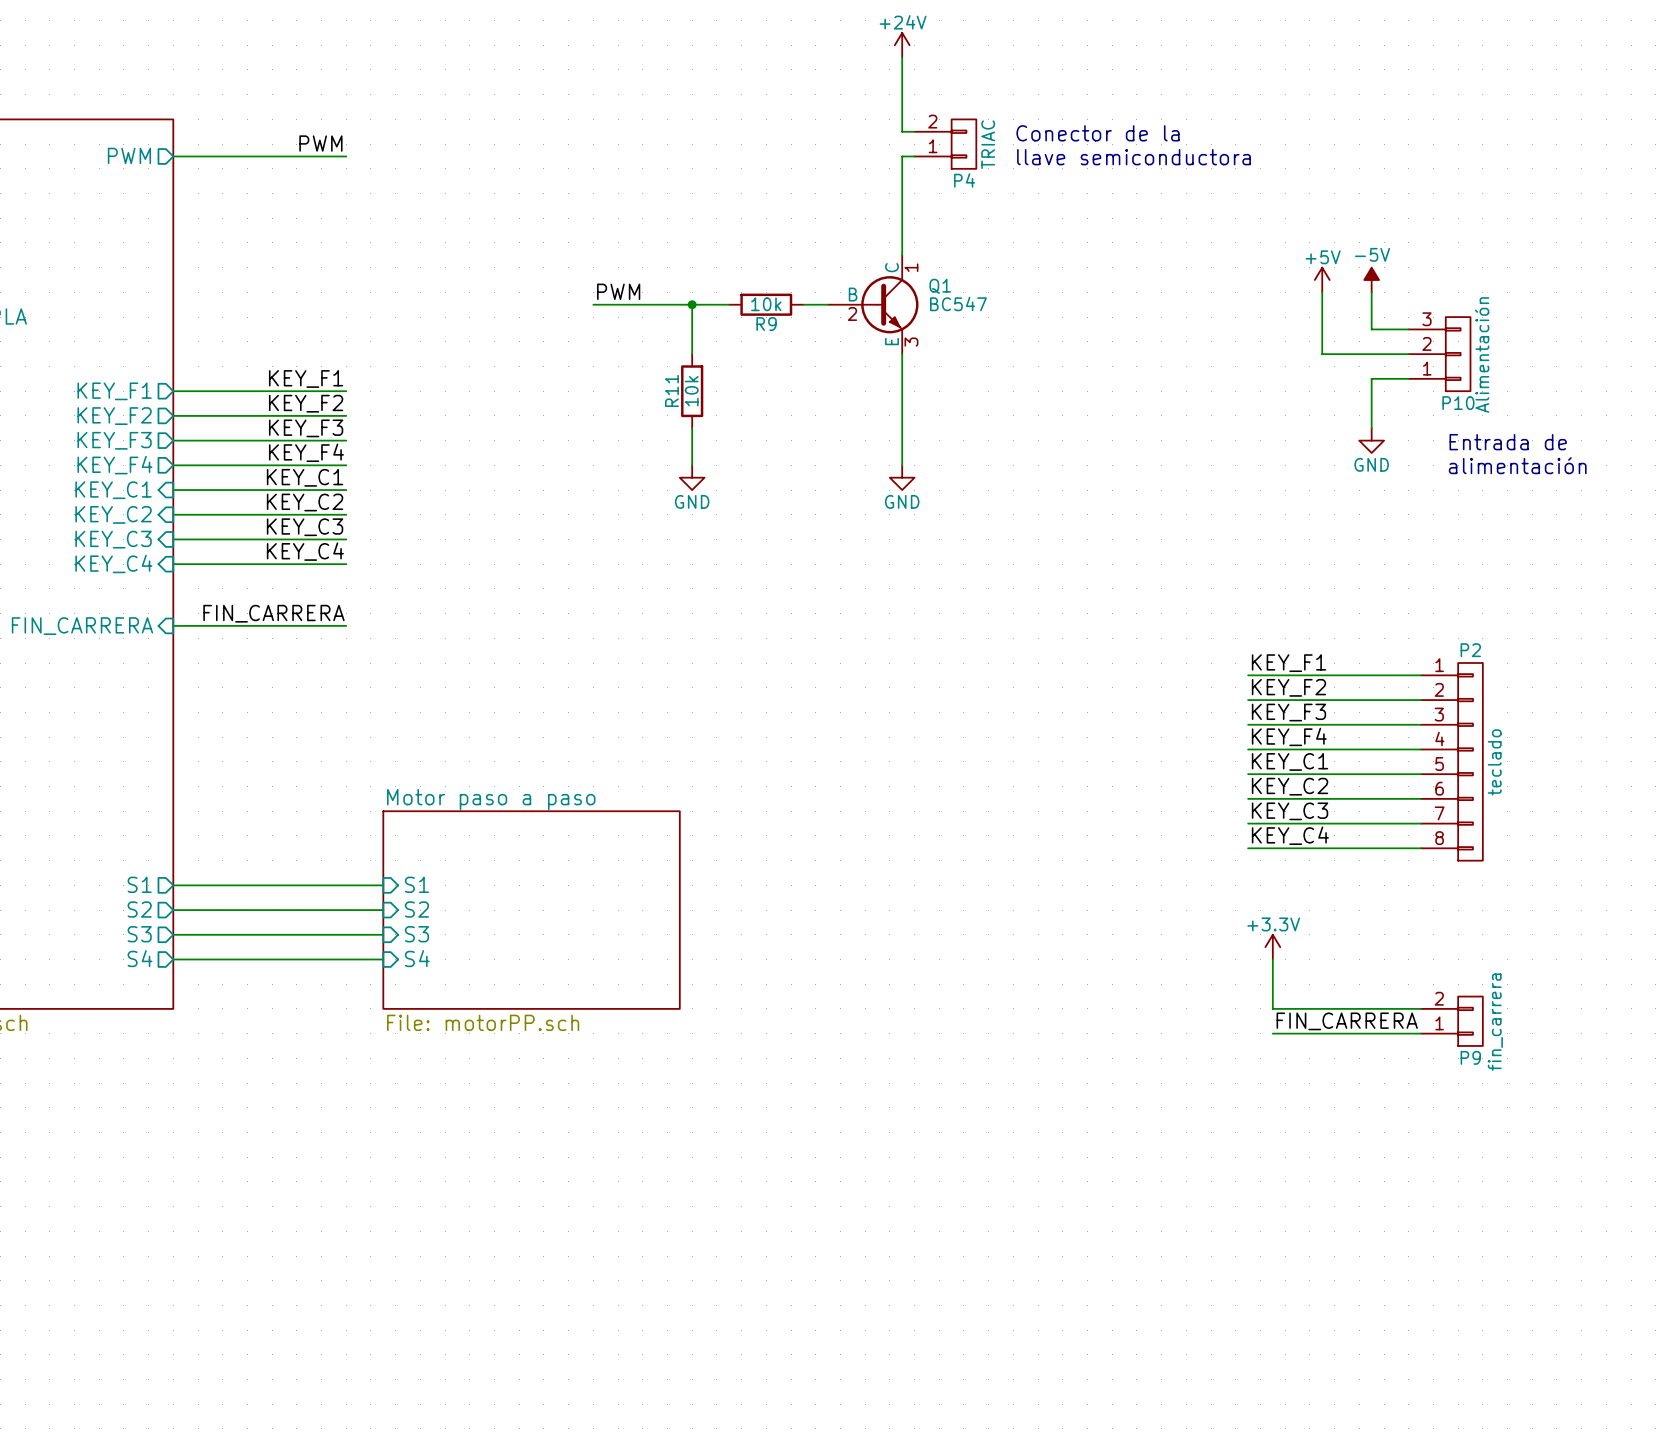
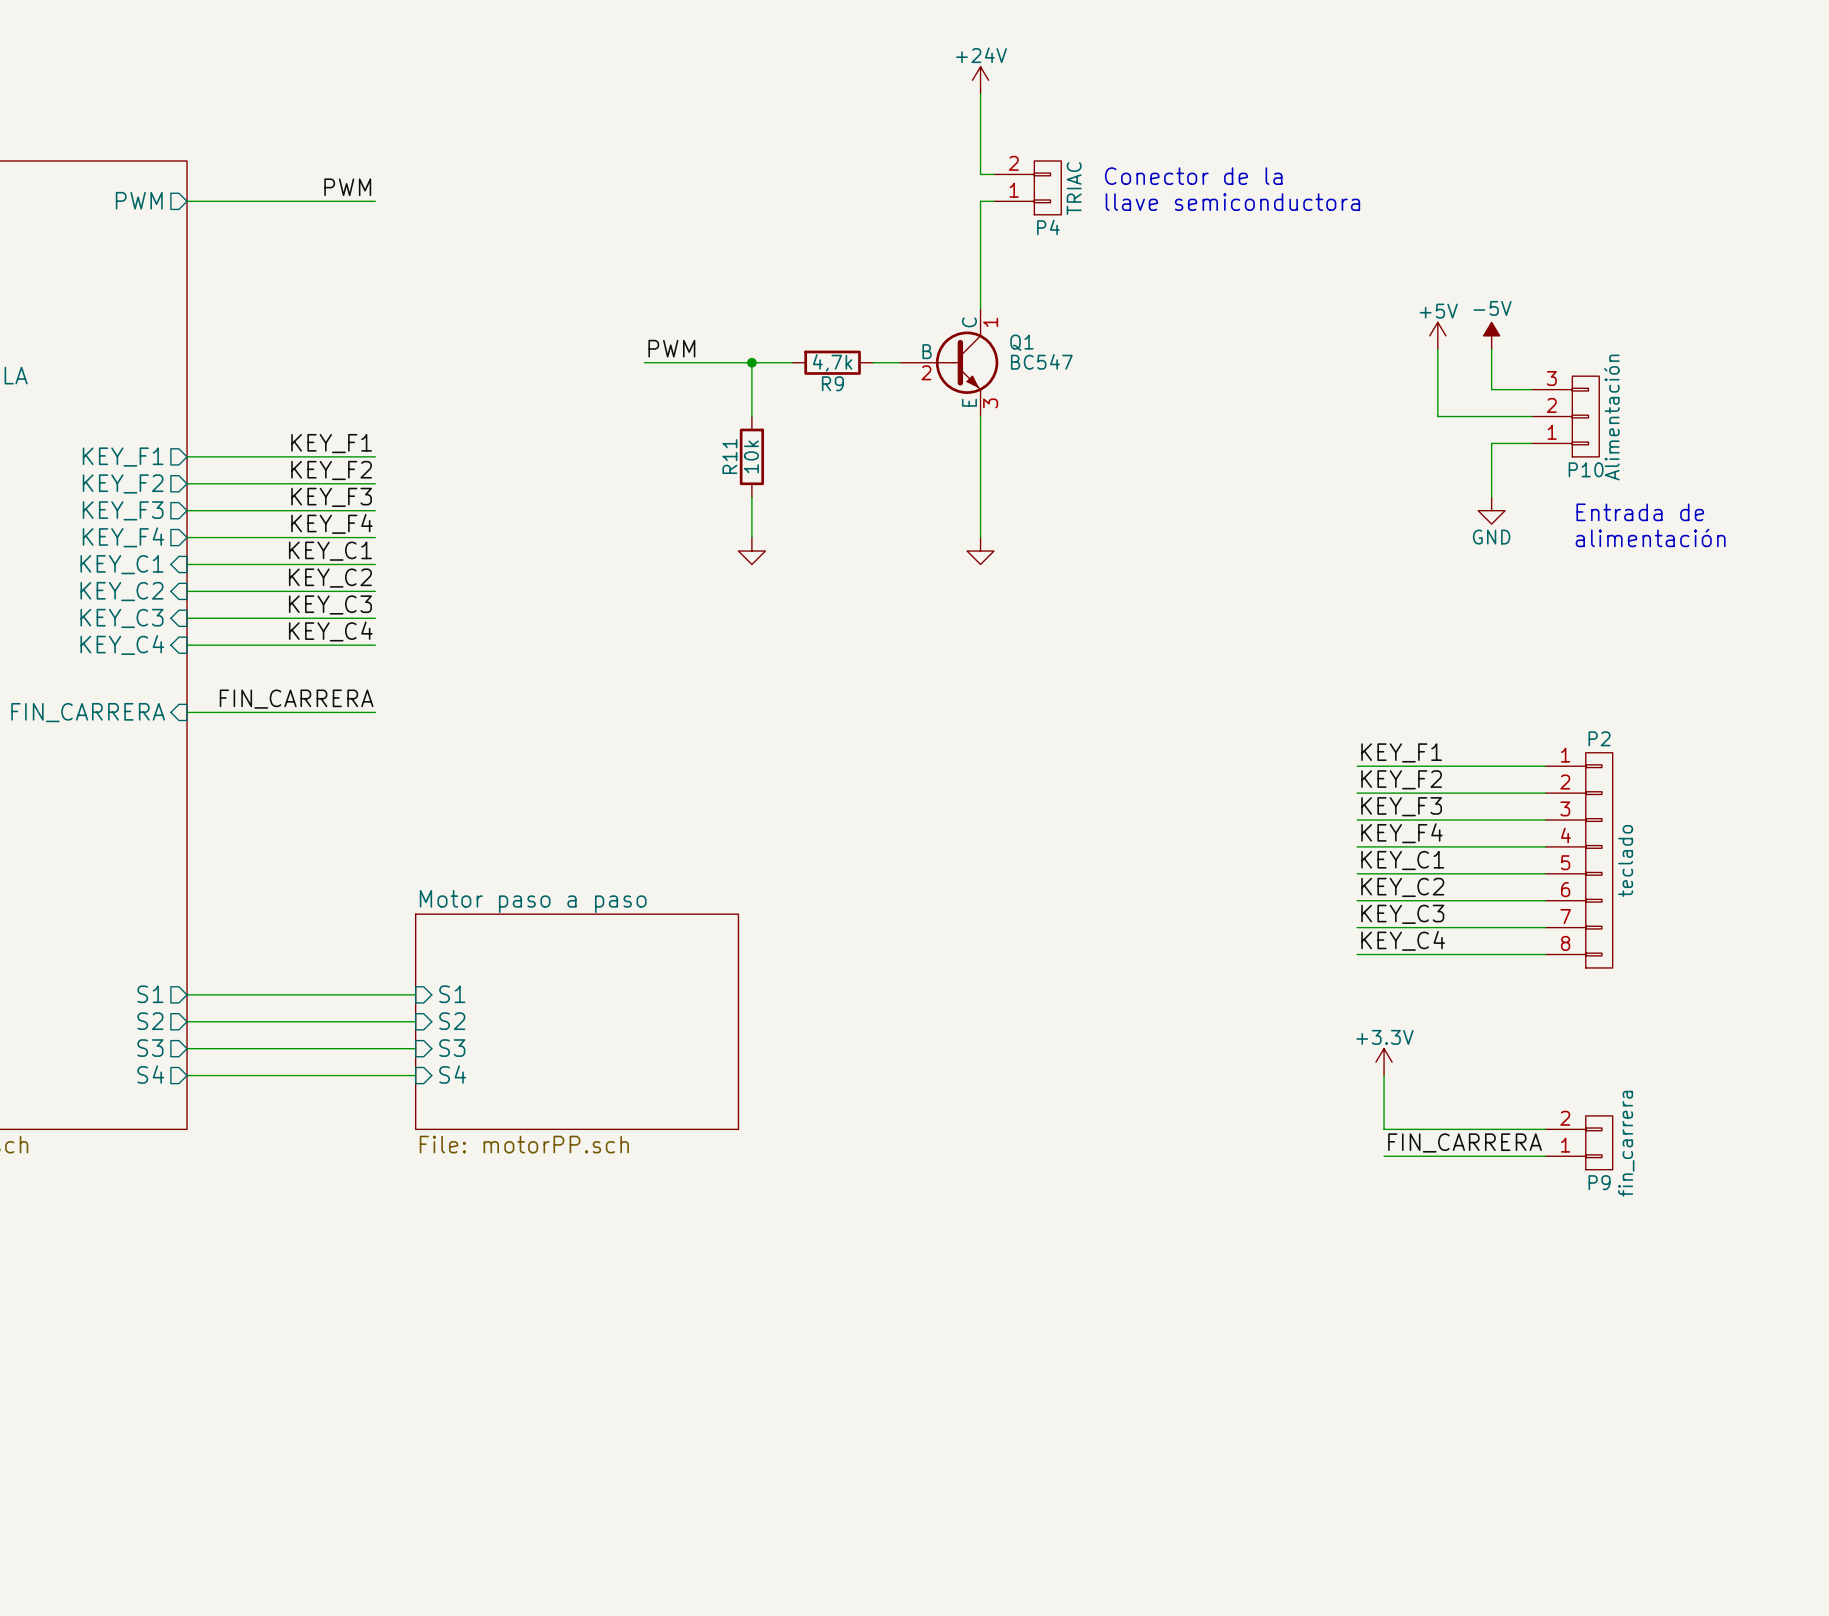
R9 value: 10k (766, 304) -> 4,7k (832, 362)
power symbol text: GND (692, 501) -> none
power symbol text: GND (902, 501) -> none

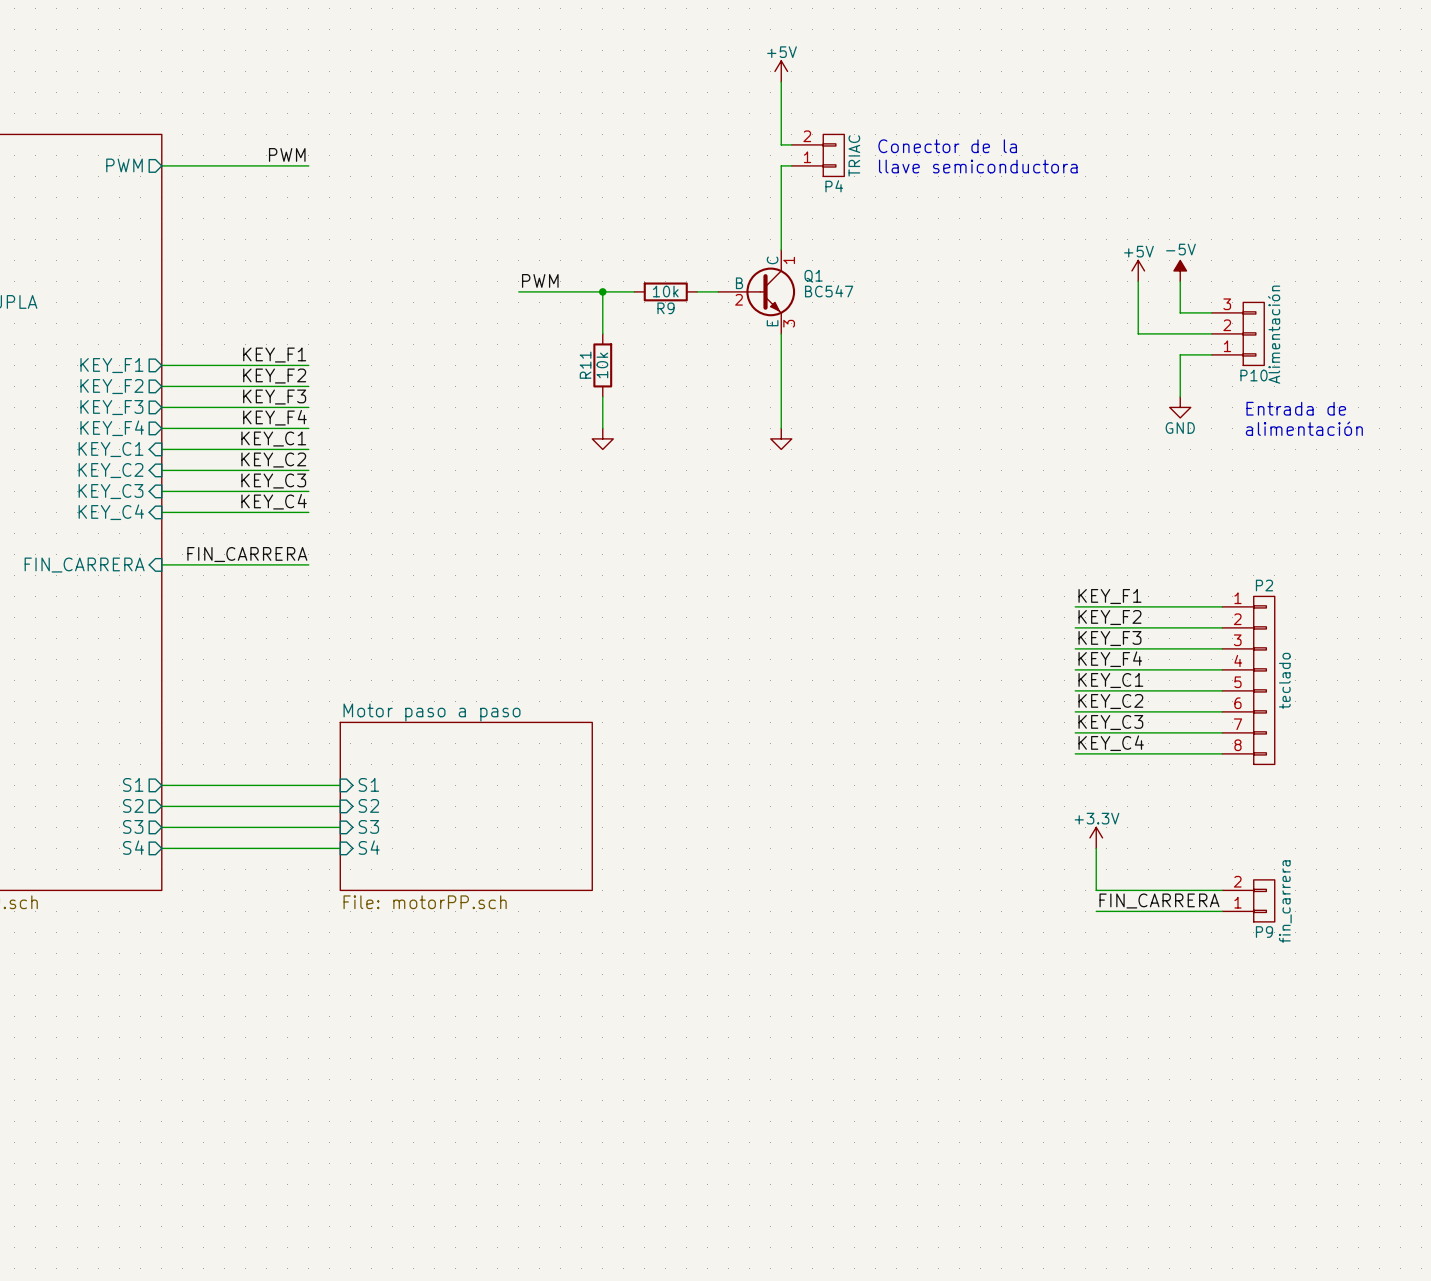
power symbol: +24V (980, 80) -> +5V (781, 71)
R9 value: 4,7k (832, 362) -> 10k (665, 291)

